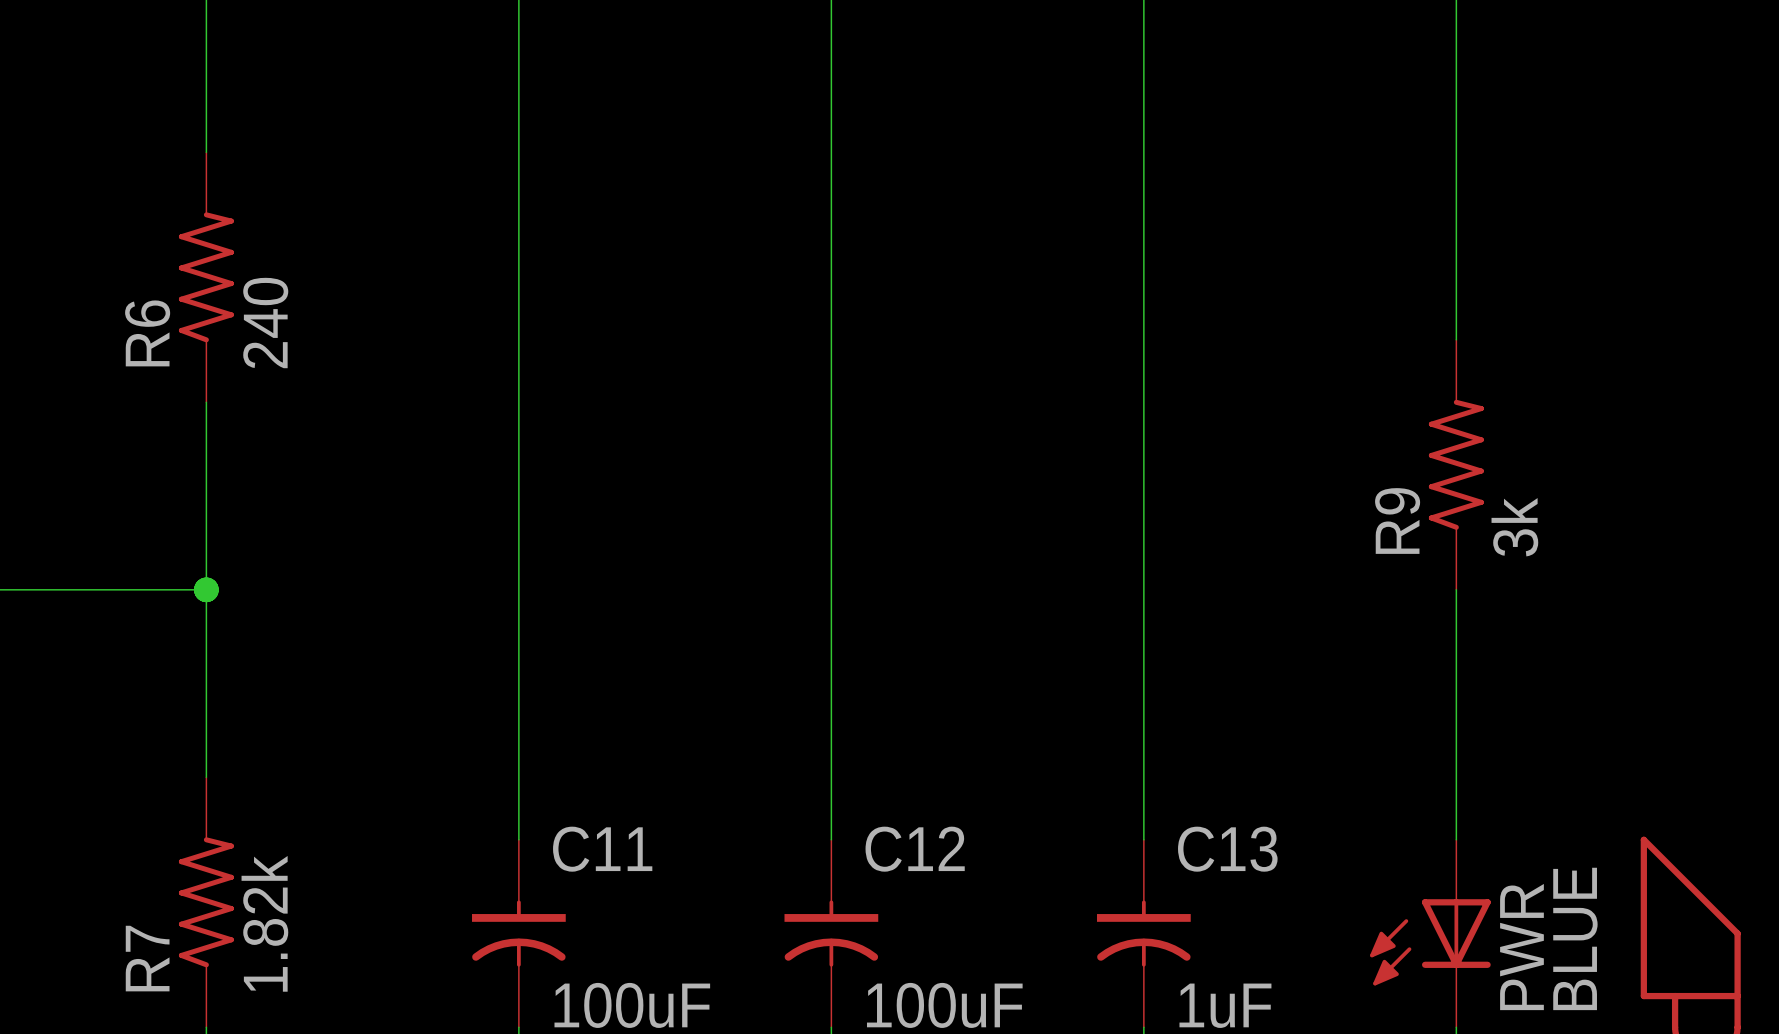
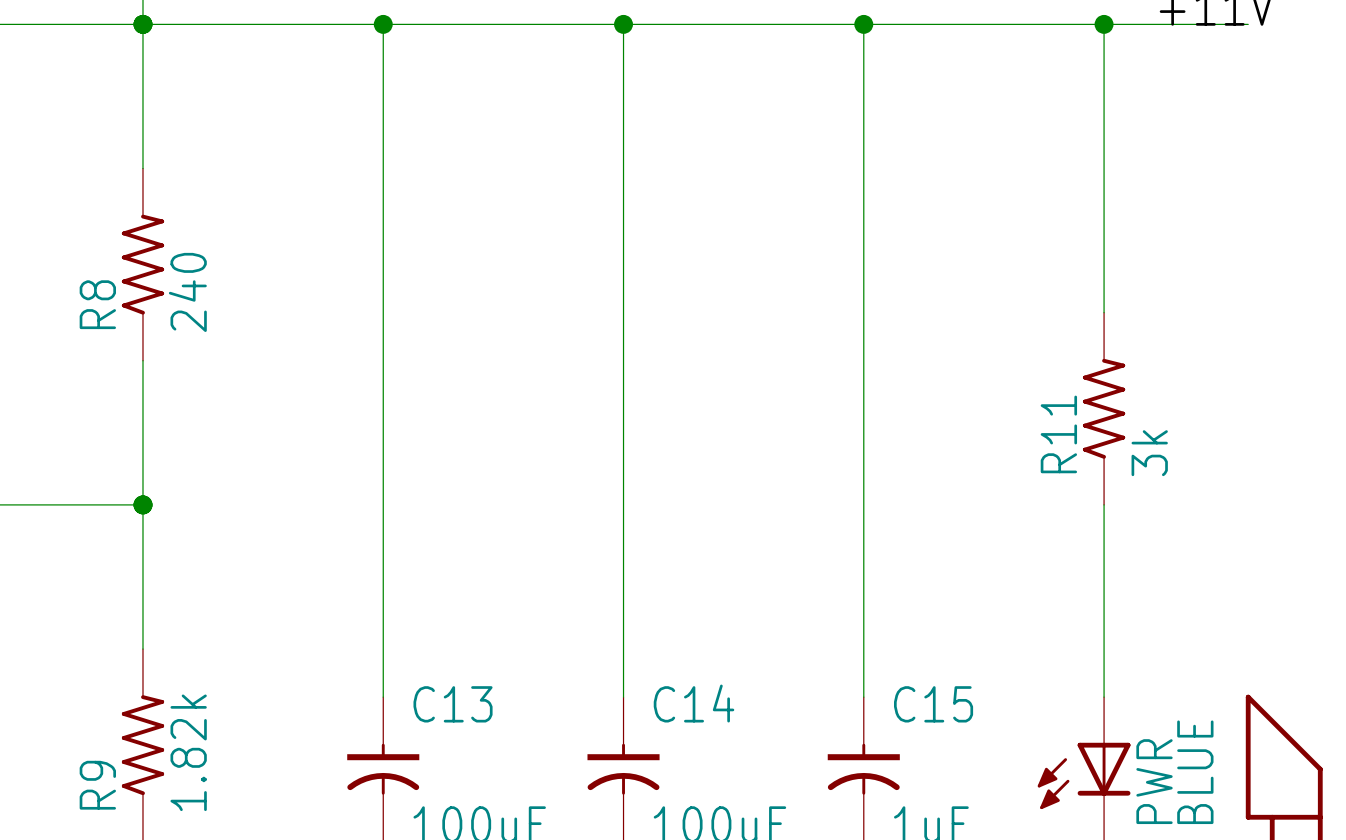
R6 name: R6 (147, 333) -> R8 (97, 304)
R9 name: R9 (1397, 521) -> R11 (1058, 434)
C11 name: C11 (602, 849) -> C13 (453, 704)
C12 name: C12 (915, 849) -> C14 (694, 703)
C13 name: C13 (1227, 849) -> C15 (933, 704)
R7 name: R7 (147, 958) -> R9 (97, 785)

